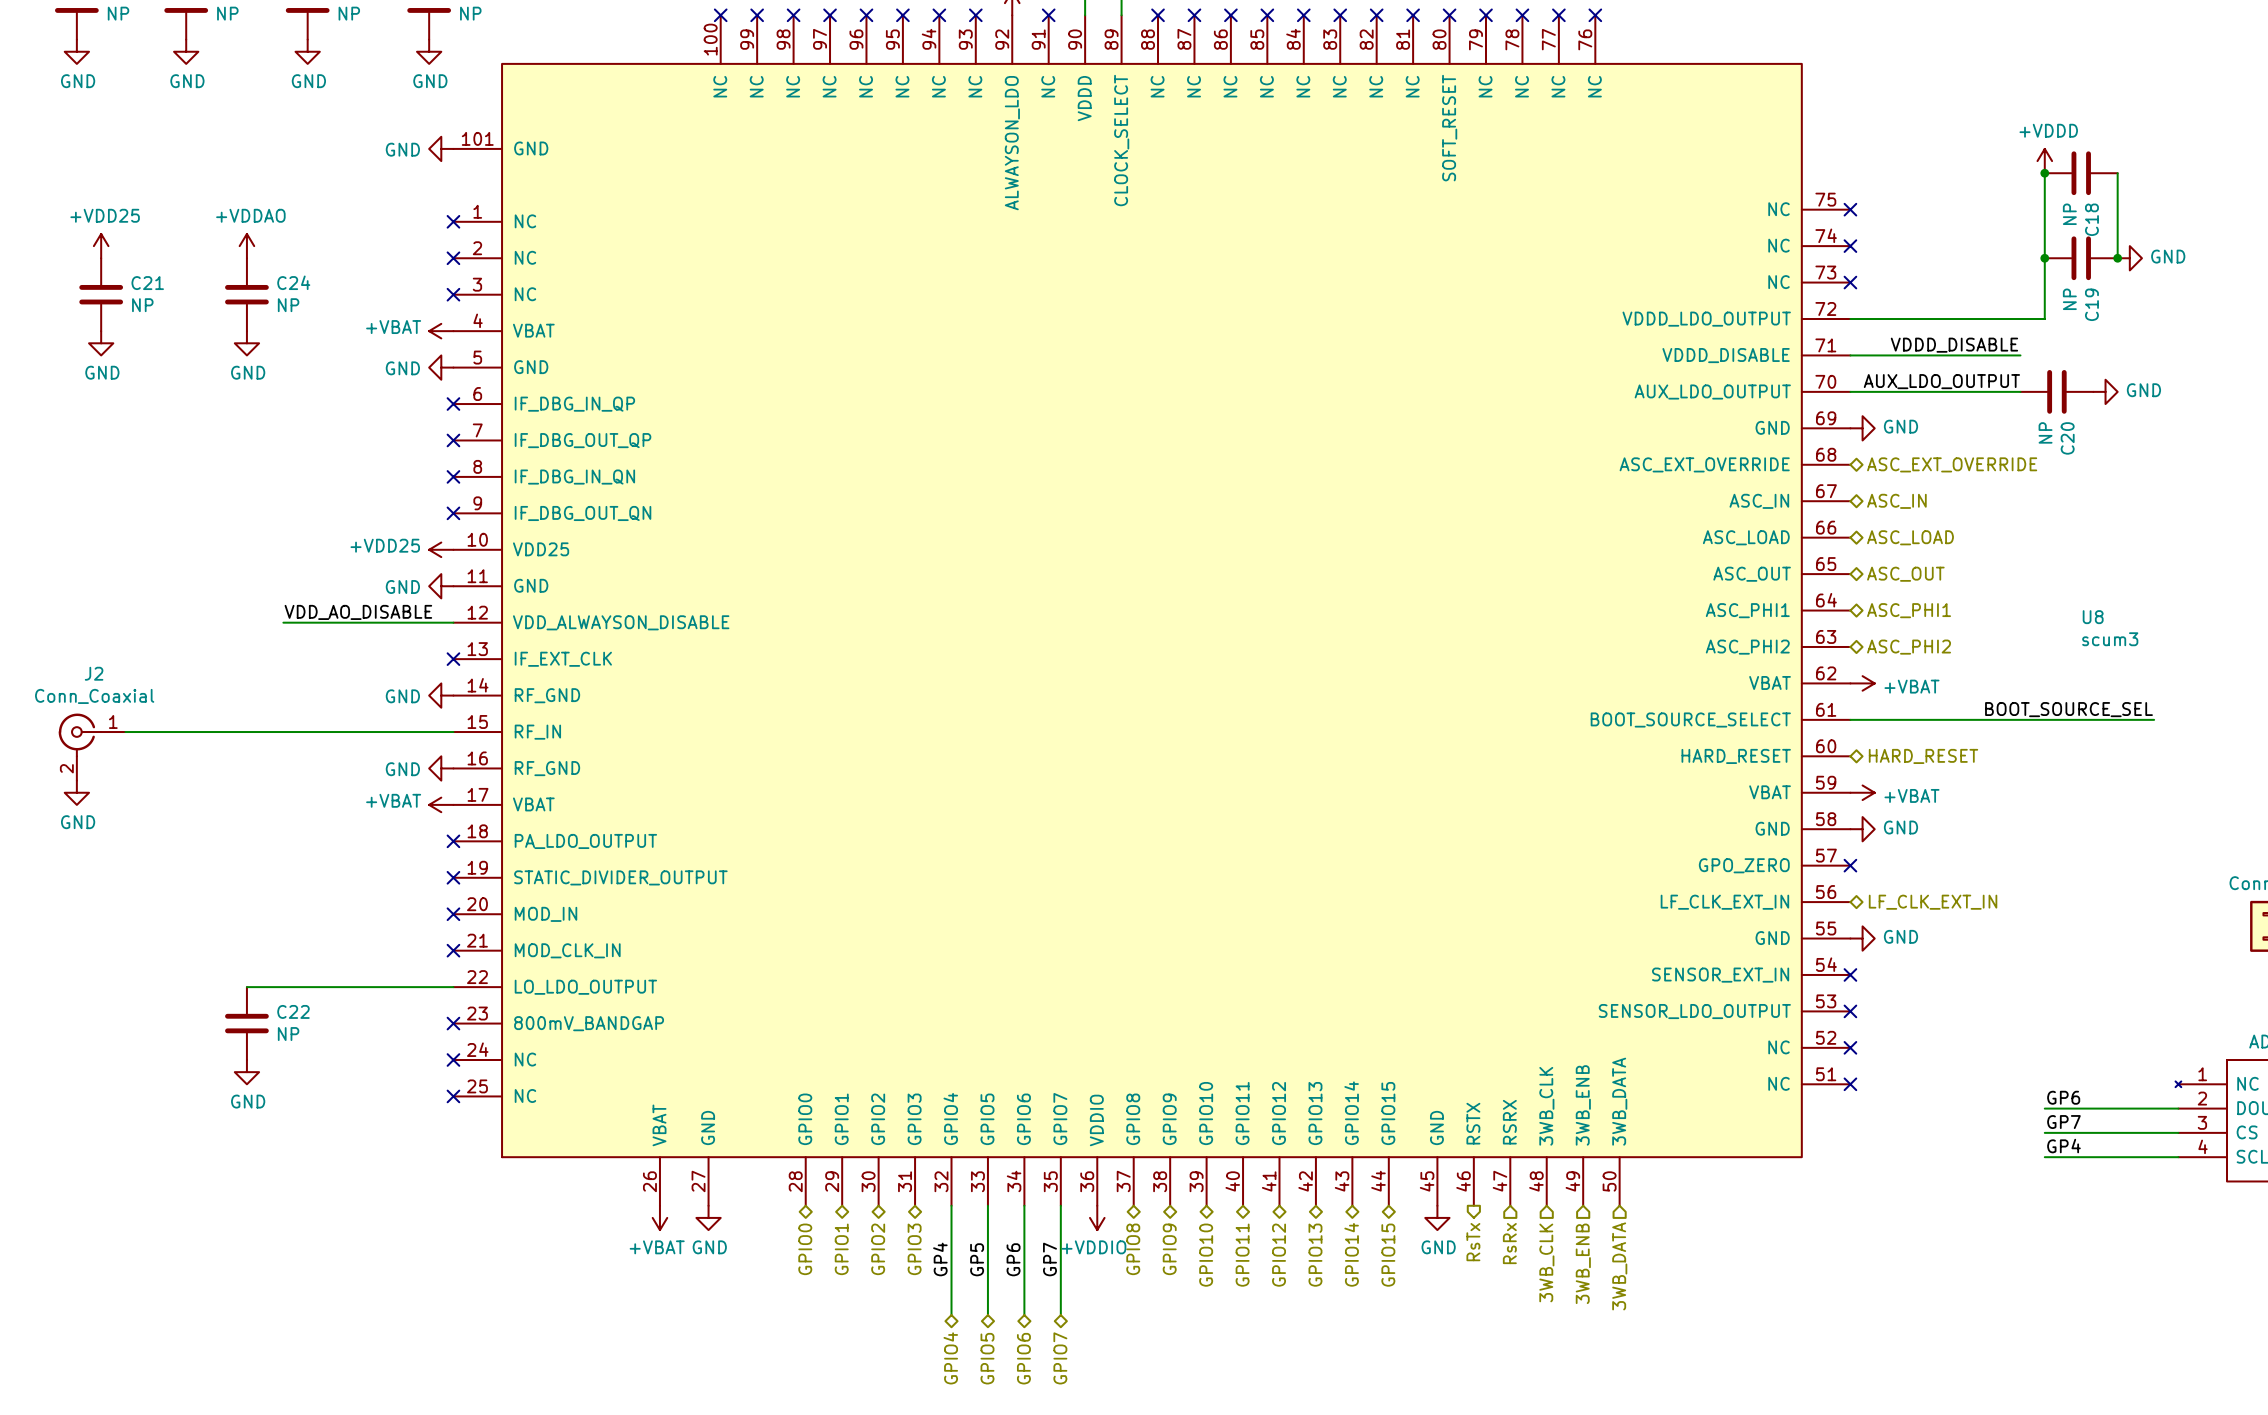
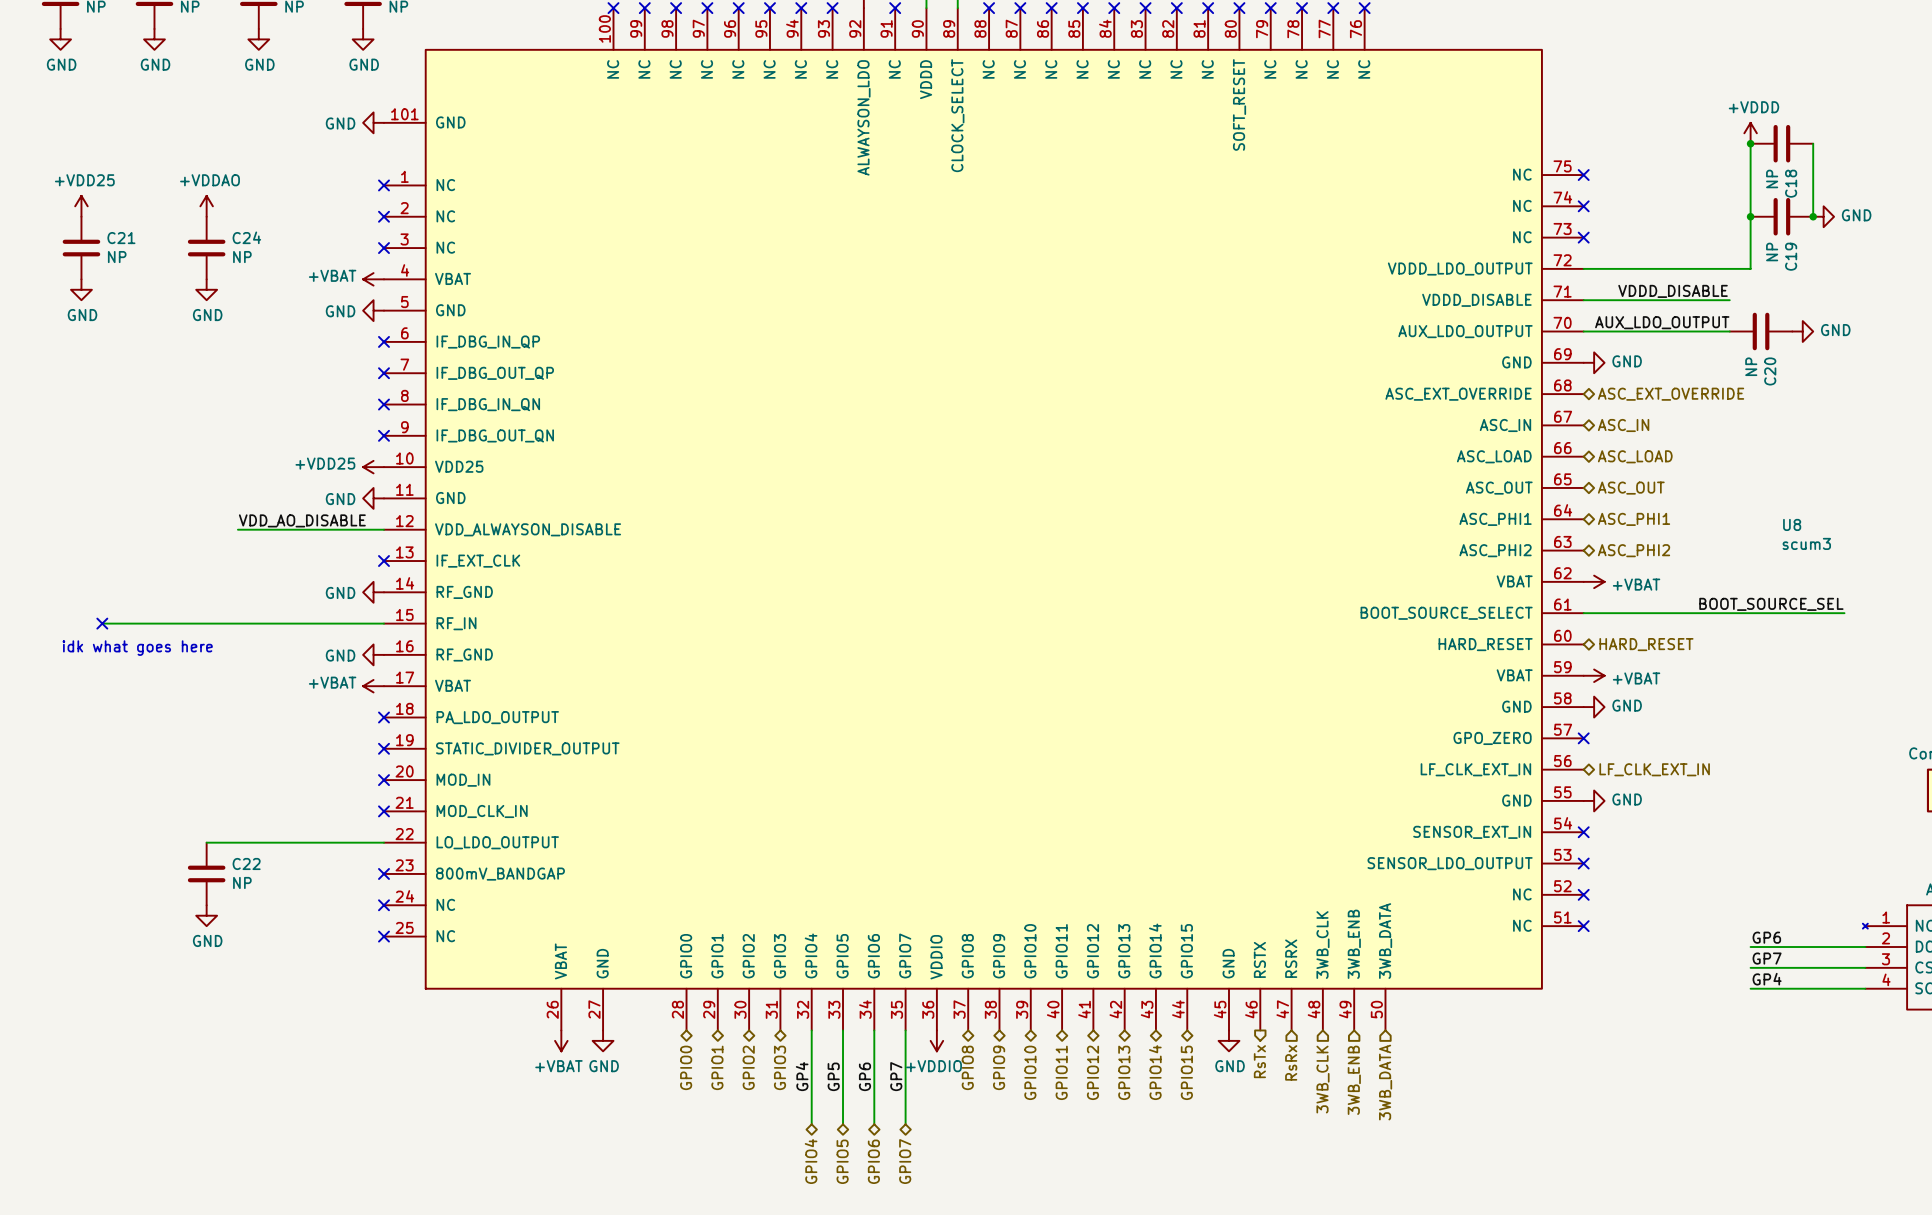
no-connect mark: none -> (102, 623)
J2: Conn_Coaxial (92, 747) -> none
text: none -> idk what goes here (137, 648)
power symbol: GND (76, 792) -> none

